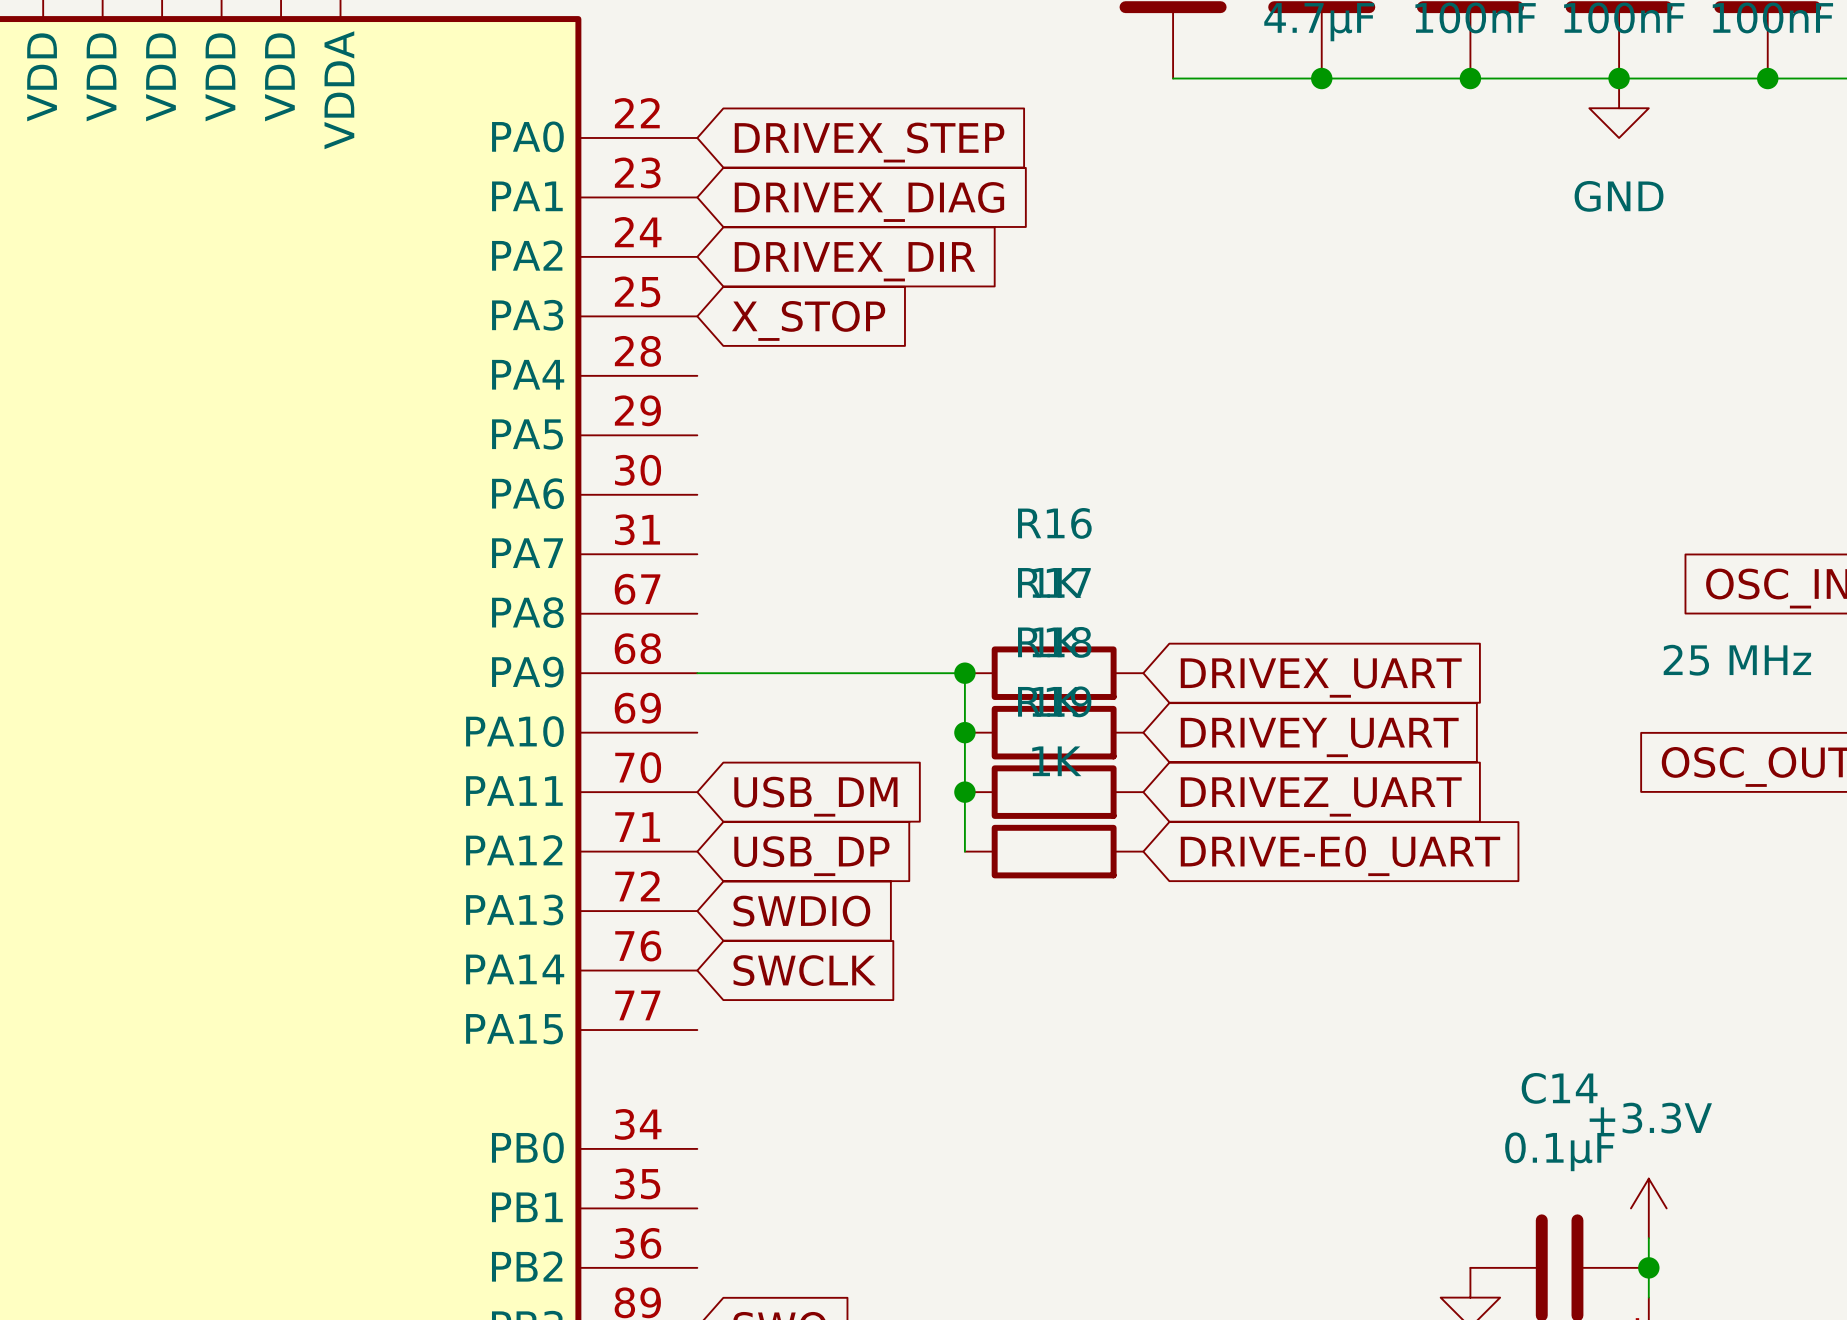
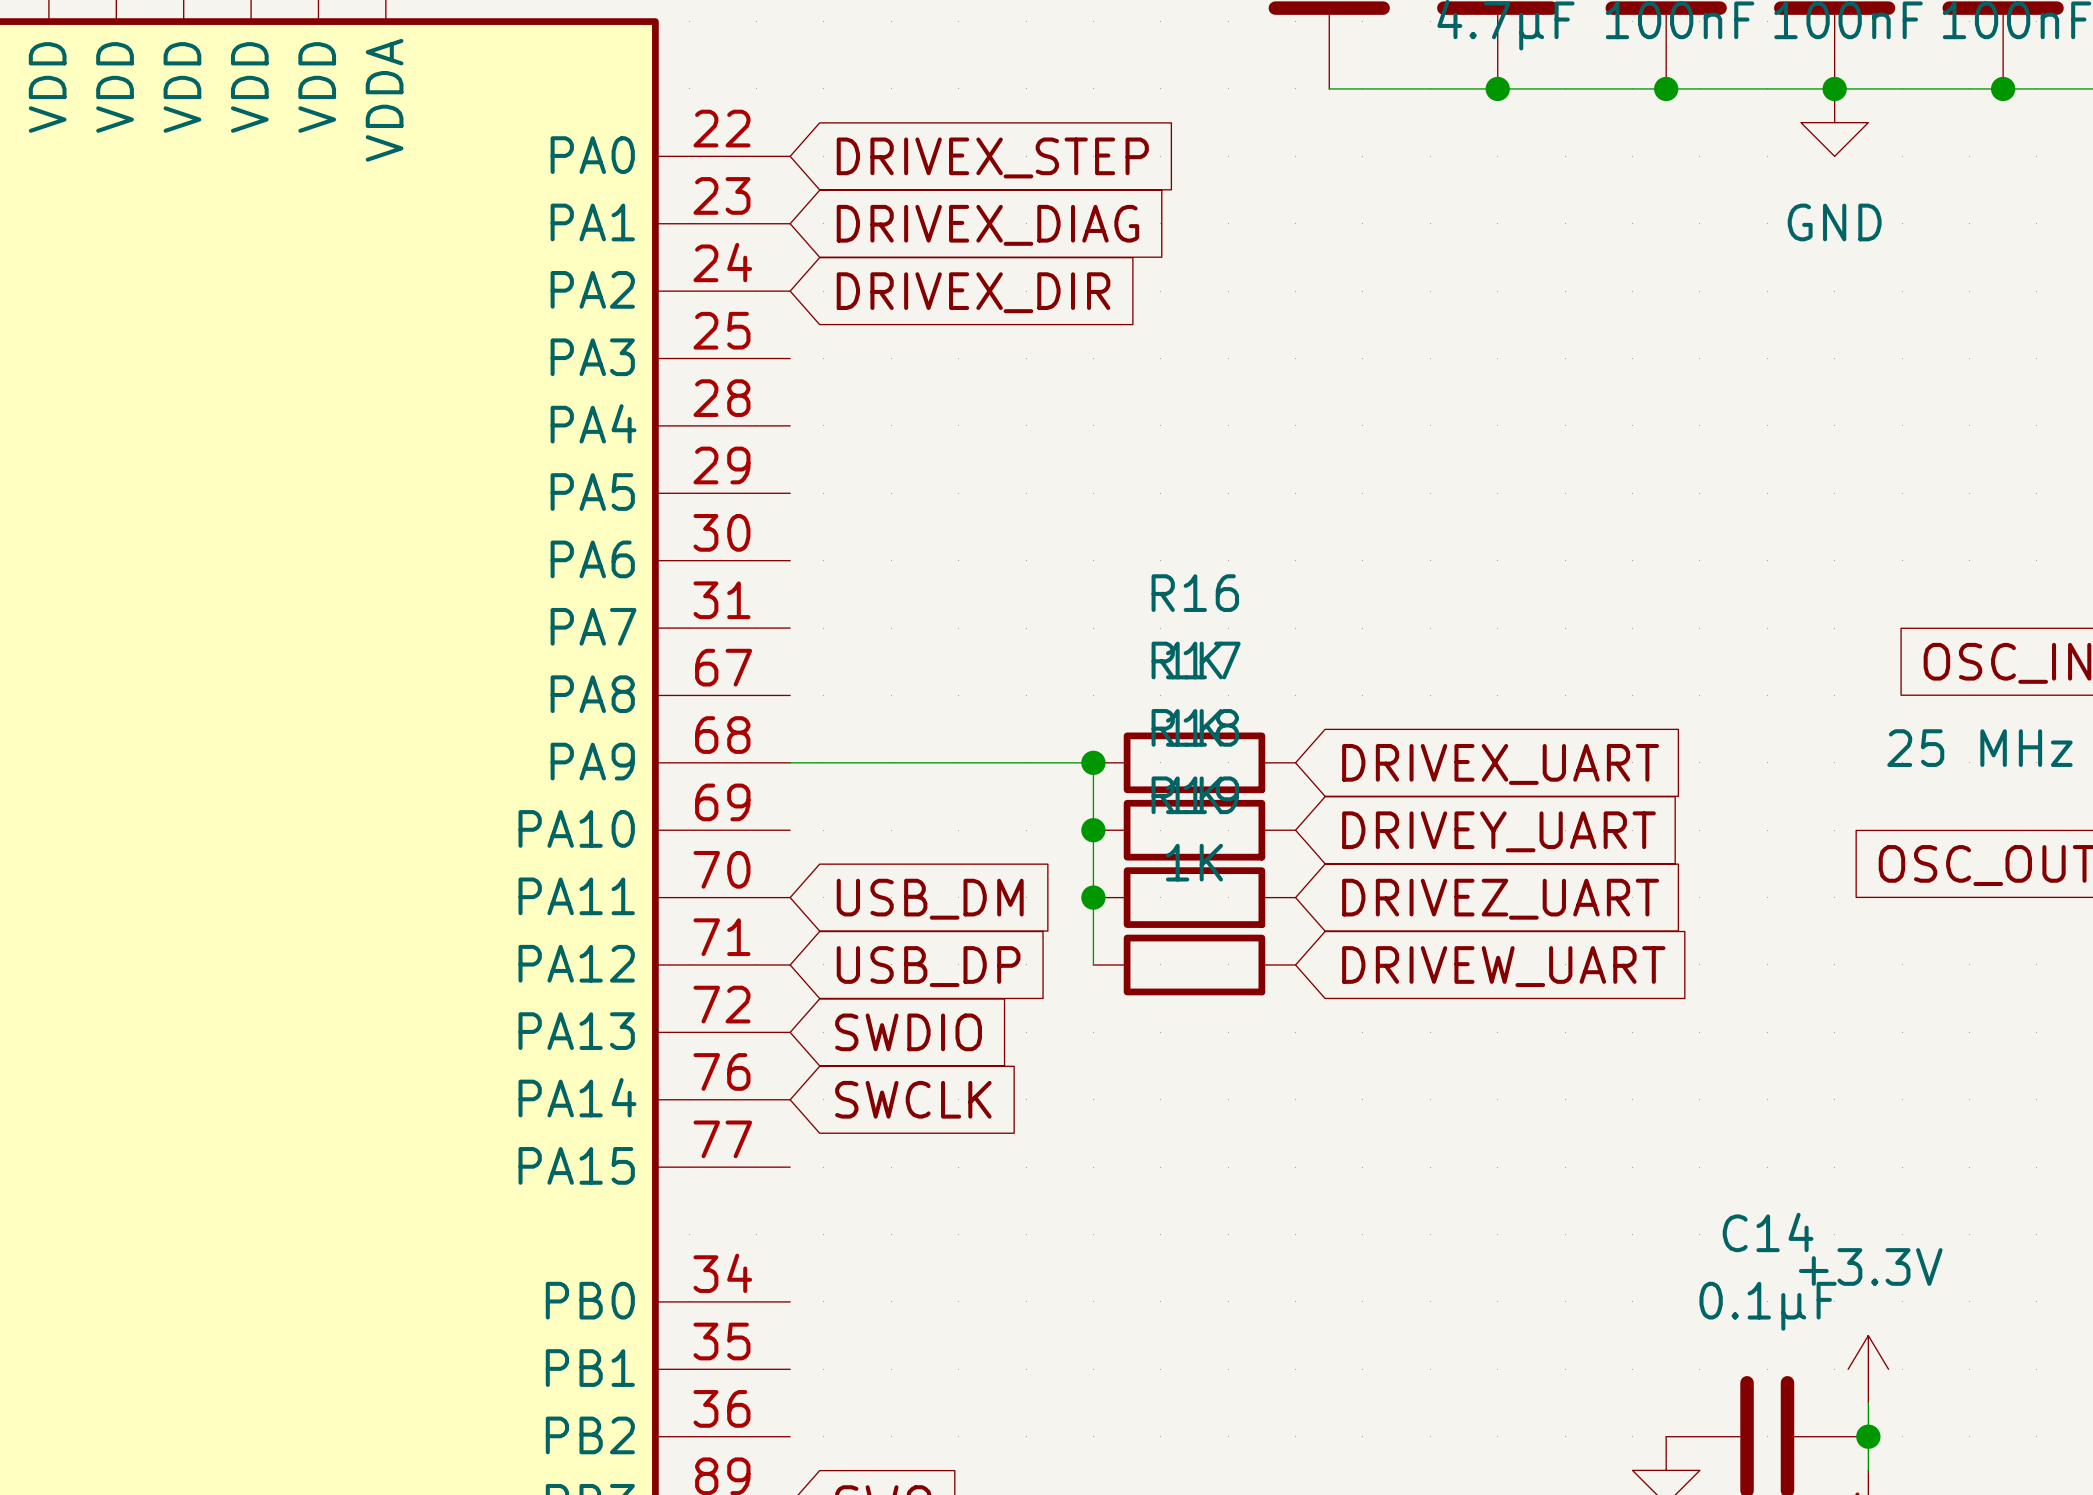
global label: X_STOP (808, 320) -> none
global label: DRIVE-E0_UART (1340, 856) -> DRIVEW_UART (1503, 966)

